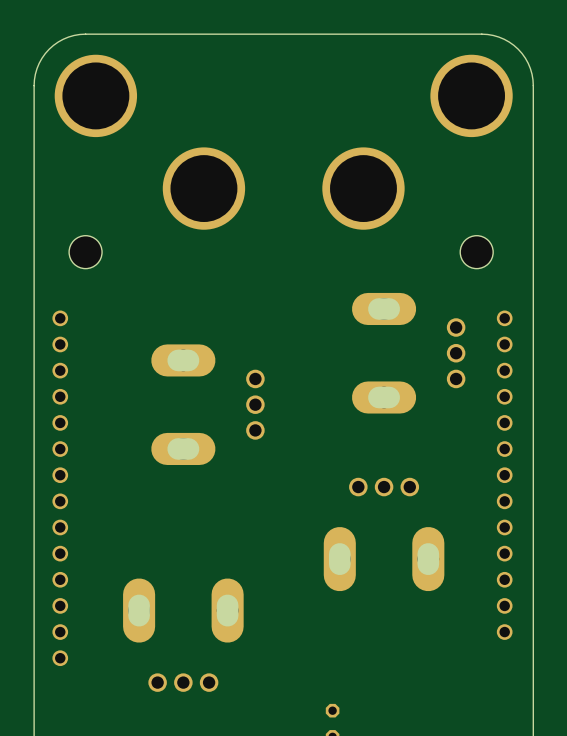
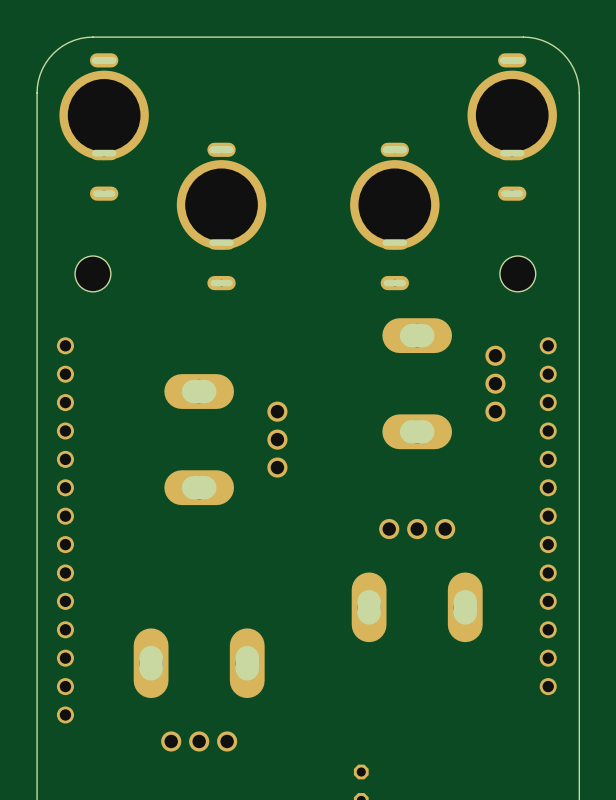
part: (95, 95) -> none
part: (471, 95) -> none
part: none -> (104, 127)
part: none -> (512, 127)
part: (203, 188) -> none
part: (363, 188) -> none
part: none -> (221, 216)
part: none -> (394, 216)

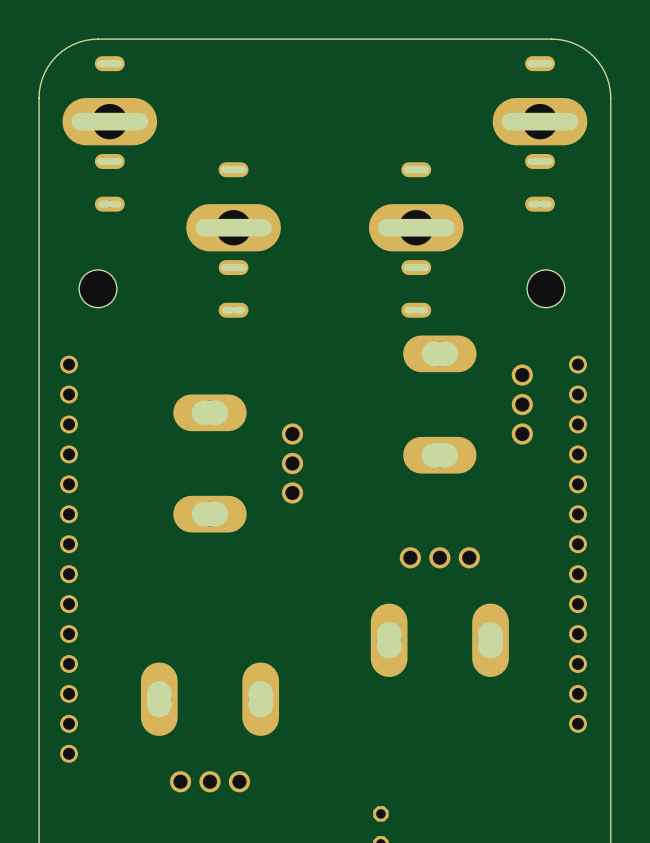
part footprint: [59, 53, 149, 201] -> [62, 56, 158, 212]
part footprint: [467, 53, 557, 201] -> [492, 56, 588, 212]
part footprint: [176, 142, 267, 291] -> [186, 162, 281, 318]
part footprint: [350, 142, 440, 291] -> [368, 162, 464, 318]

